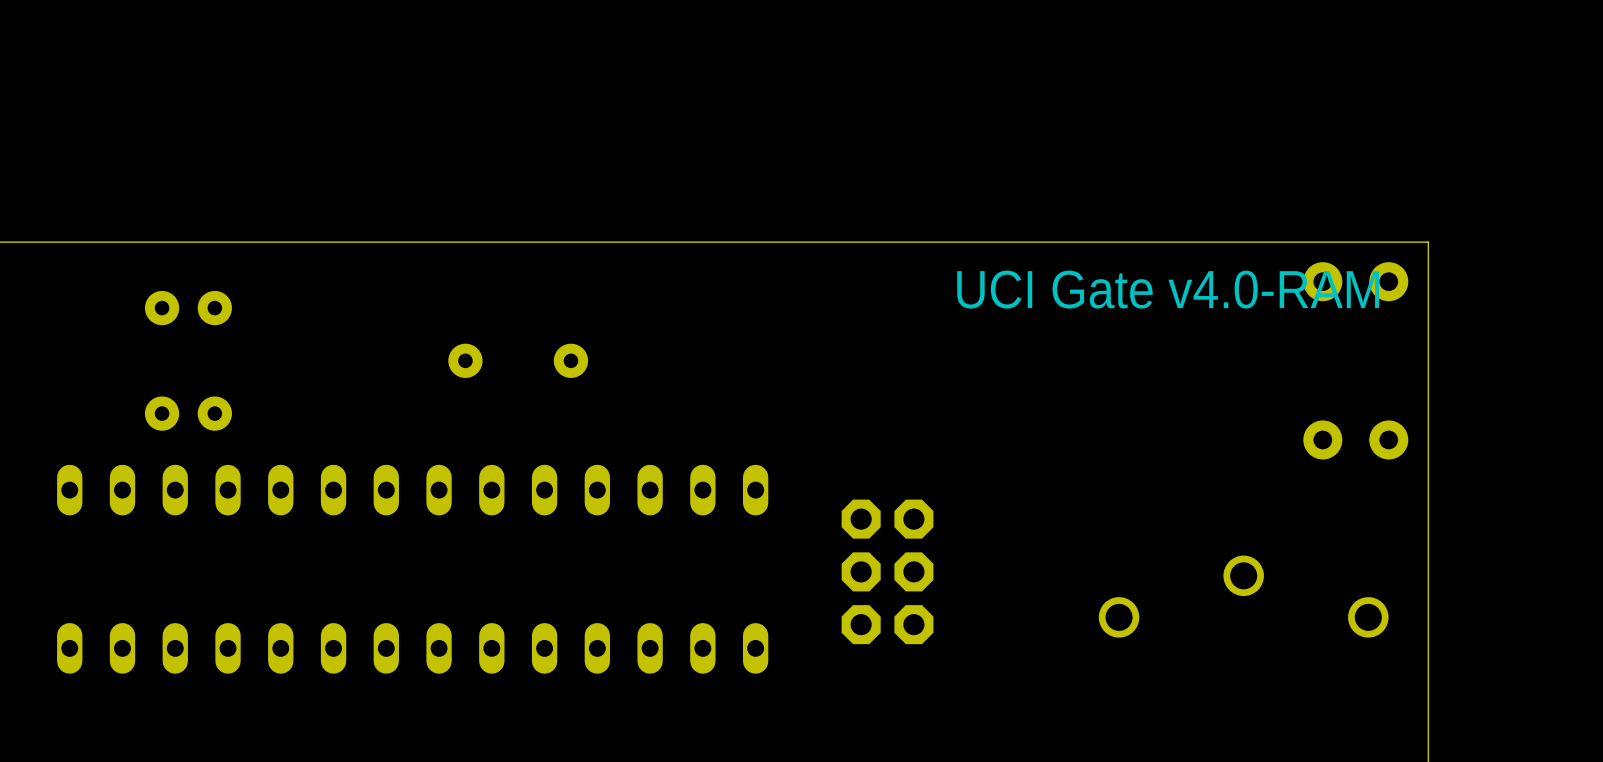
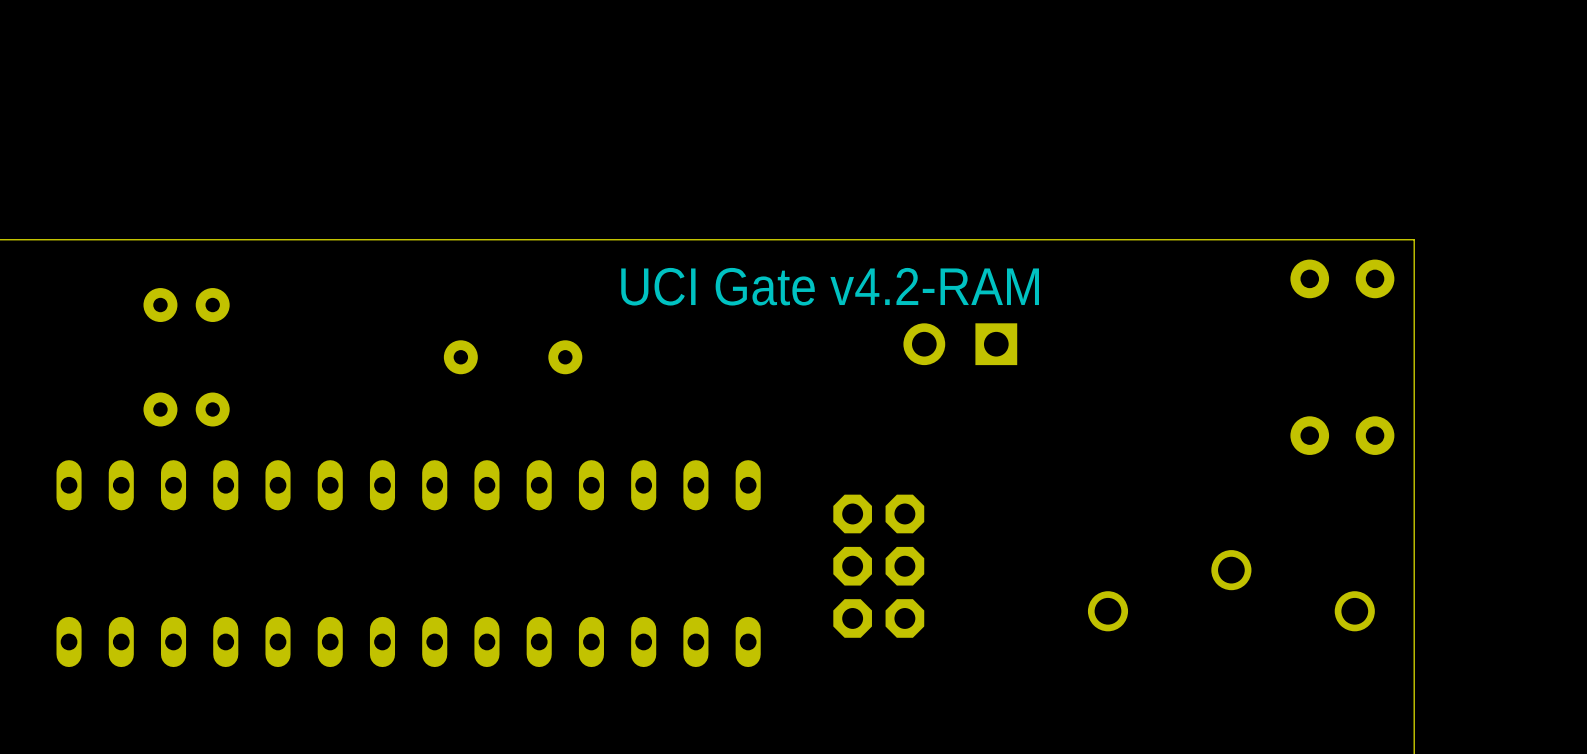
text: UCI Gate v4.0-RAM (1168, 289) -> UCI Gate v4.2-RAM (830, 286)
part: none -> (960, 344)

